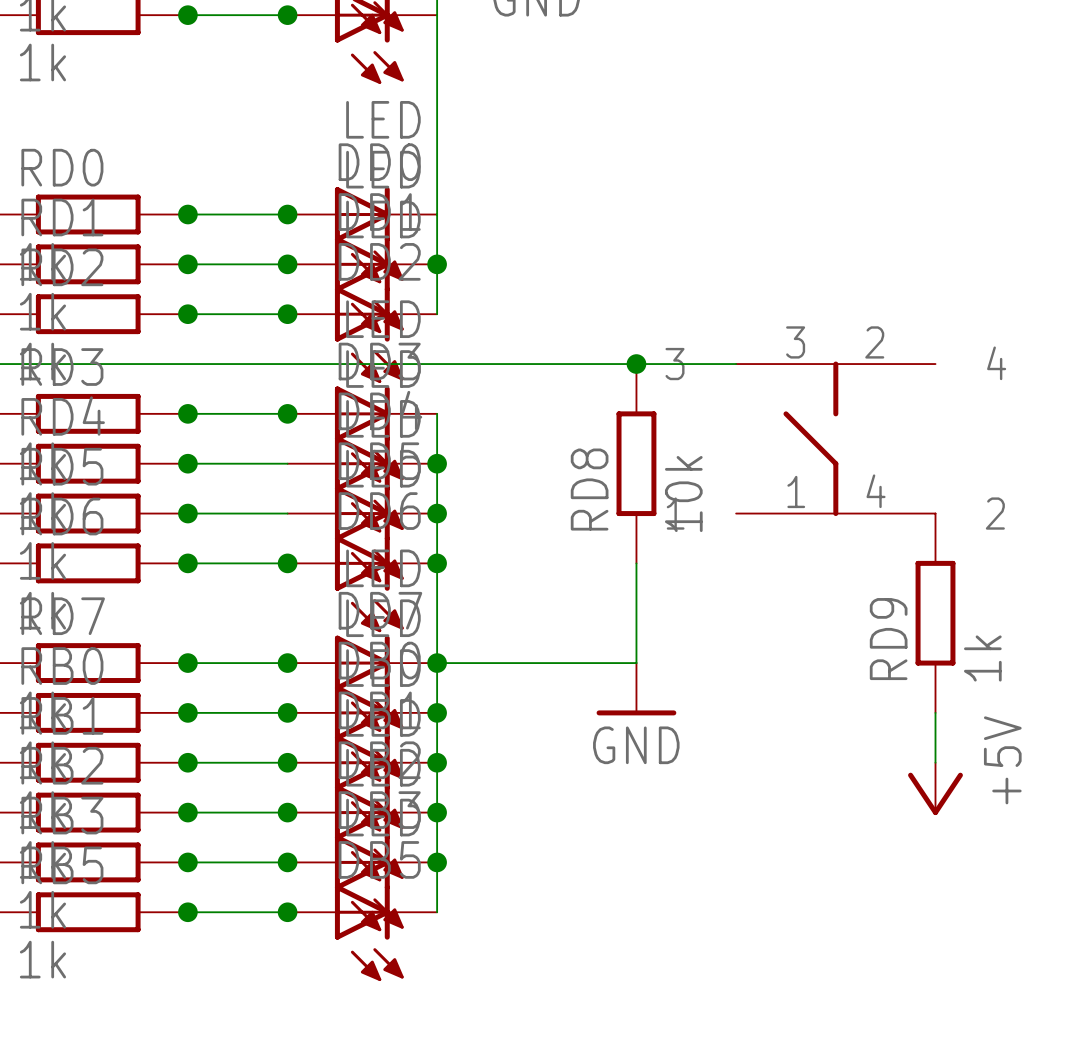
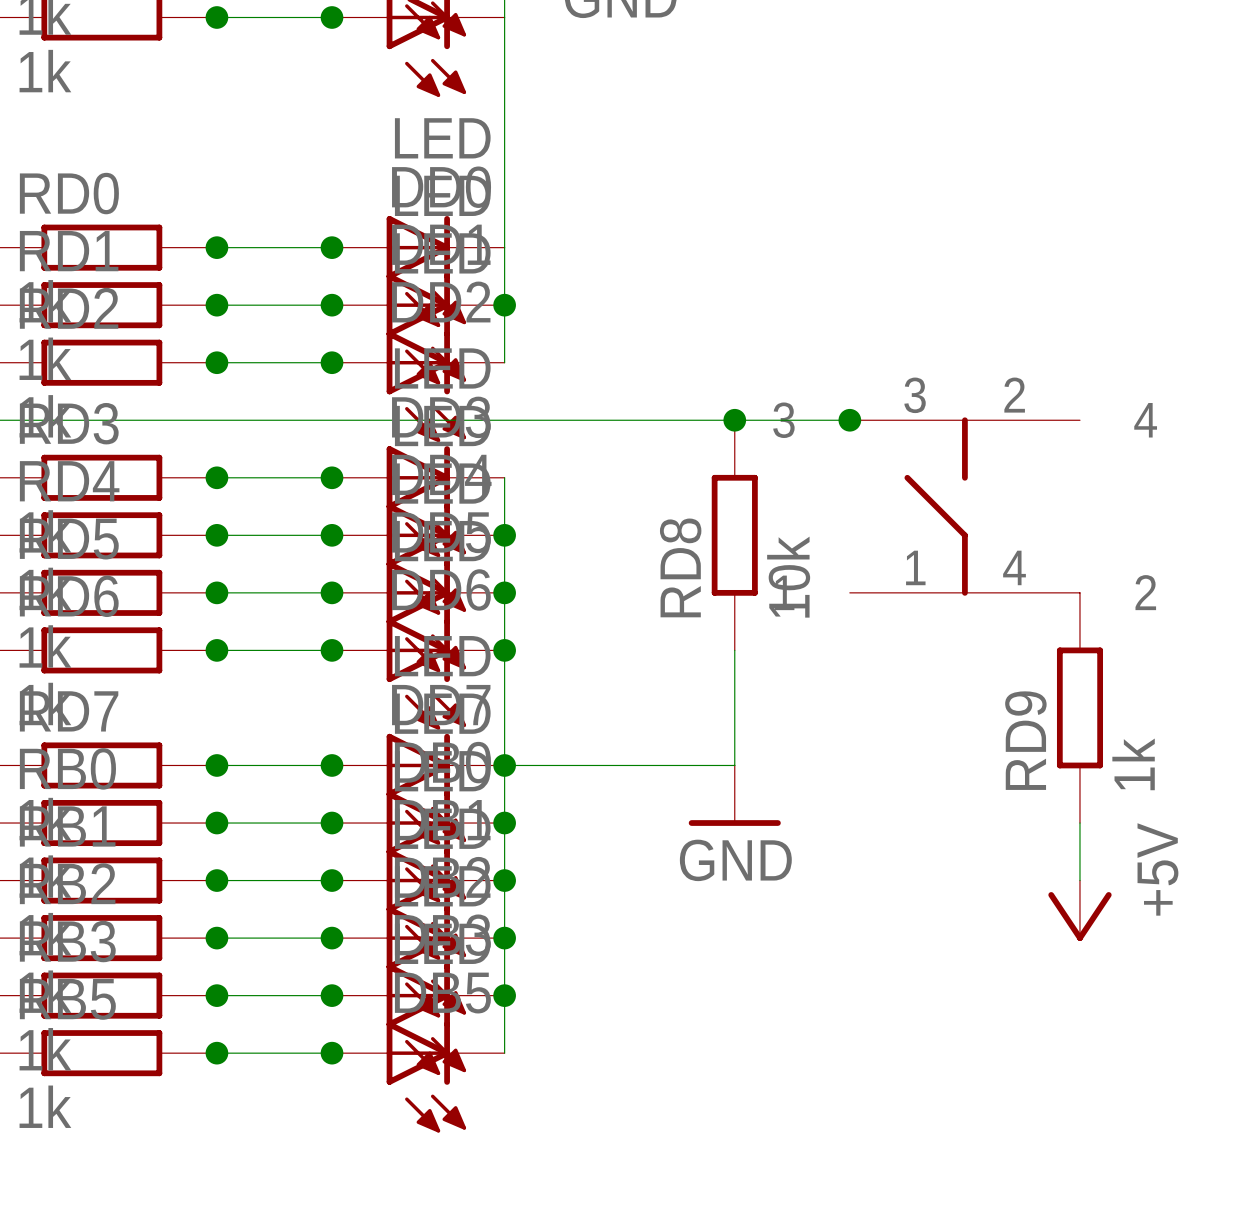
junction: none -> (849, 420)
junction: none -> (332, 535)
junction: none -> (332, 592)

